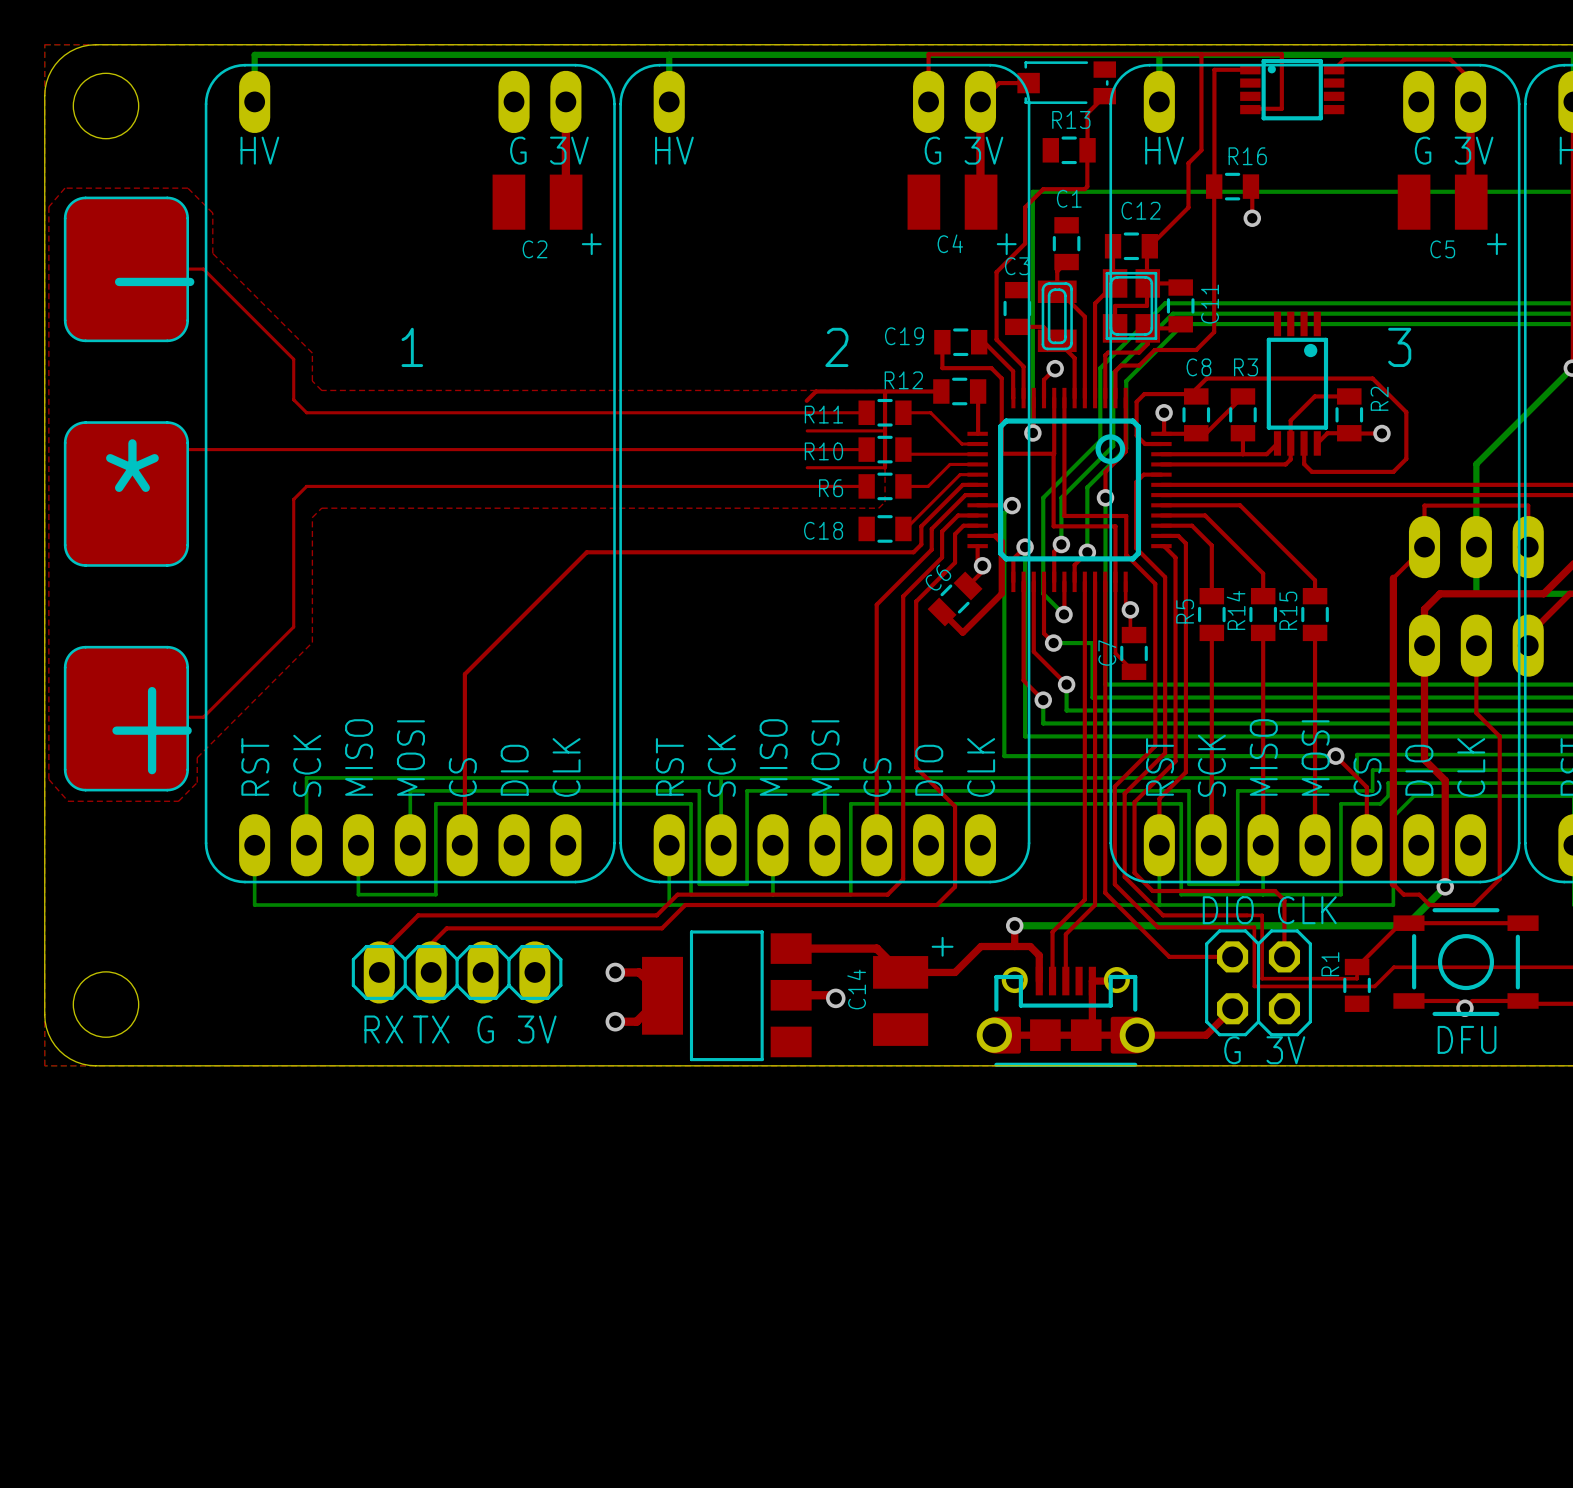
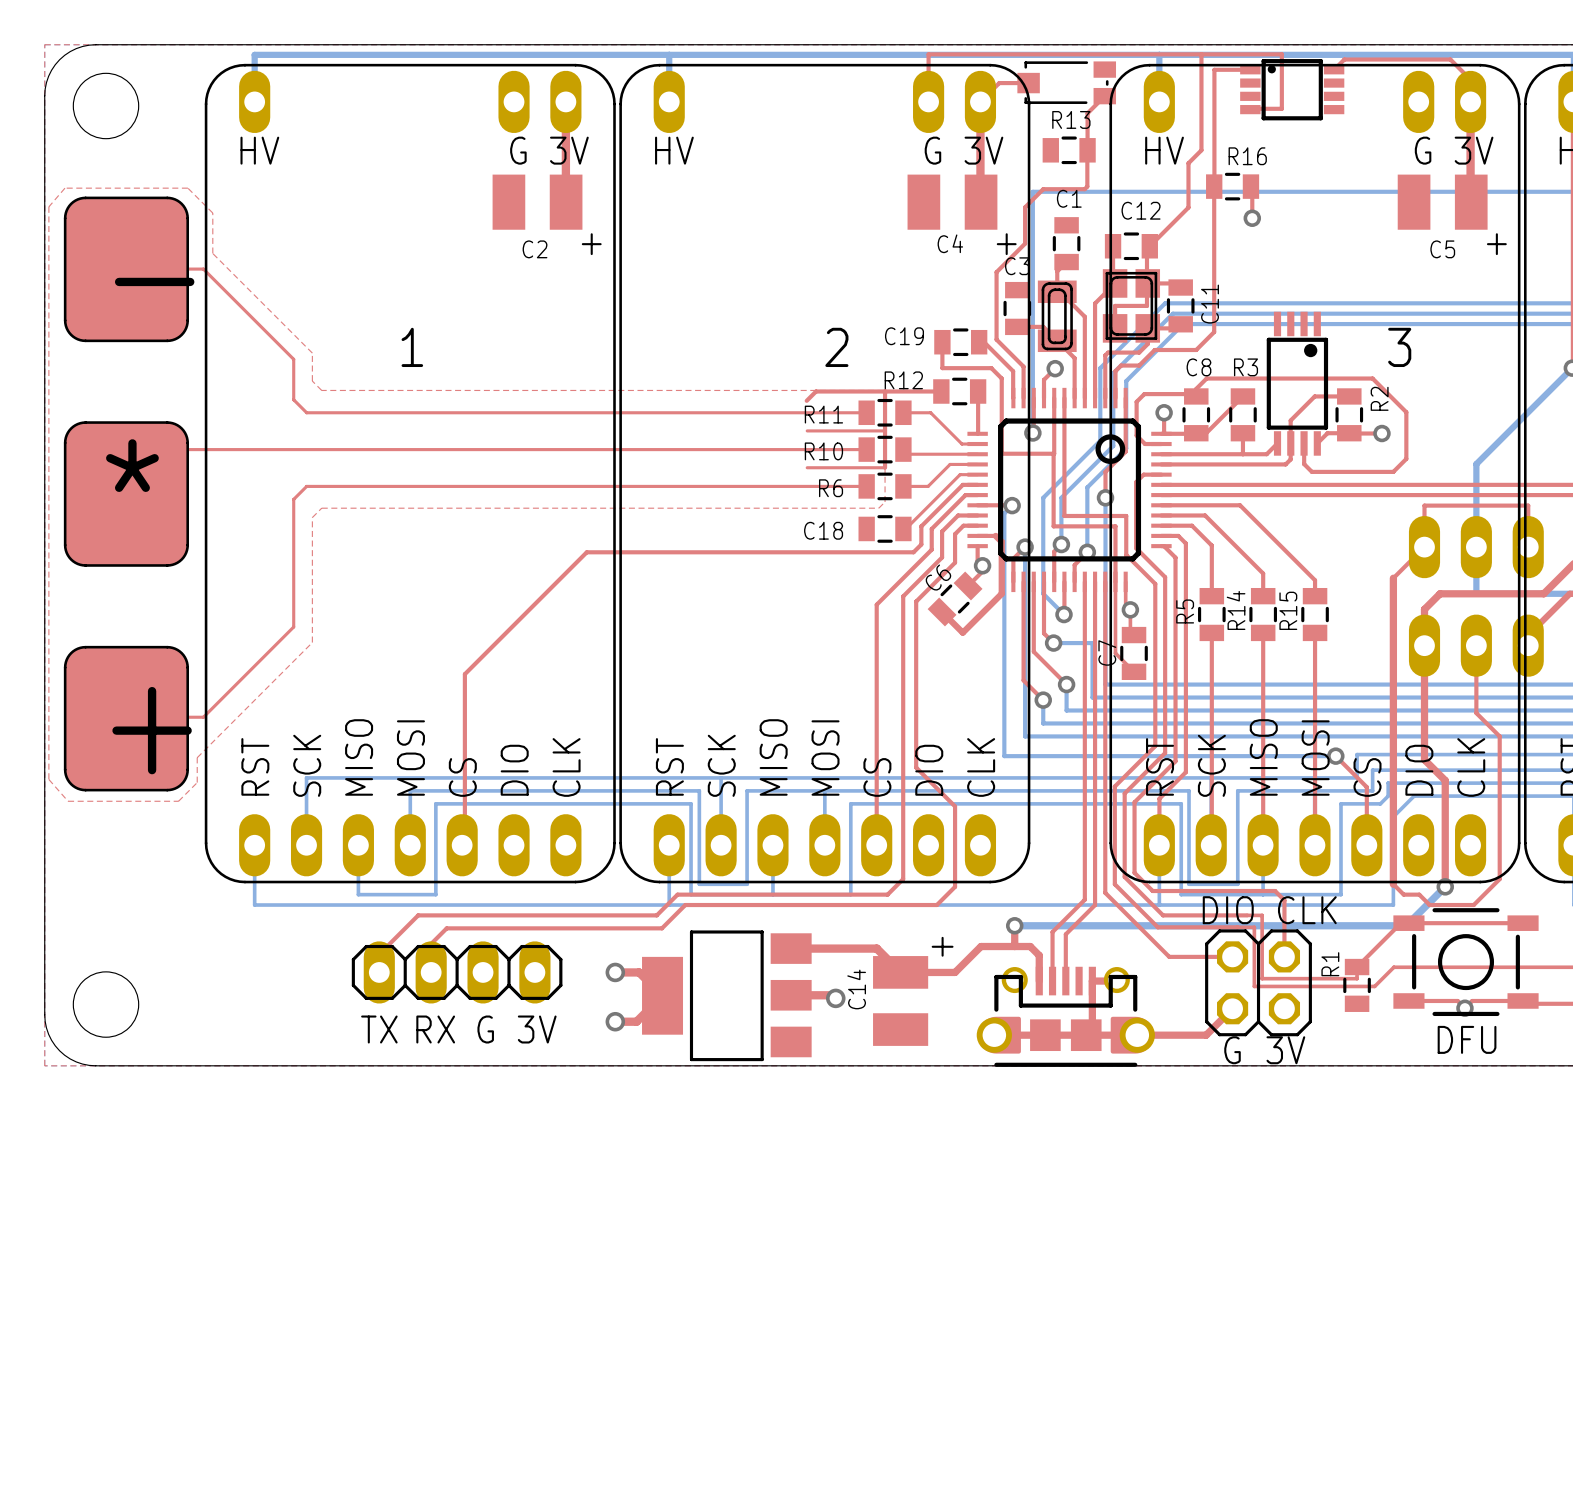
text: RX (383, 1029) -> TX (379, 1029)
text: TX (431, 1029) -> RX (435, 1029)

